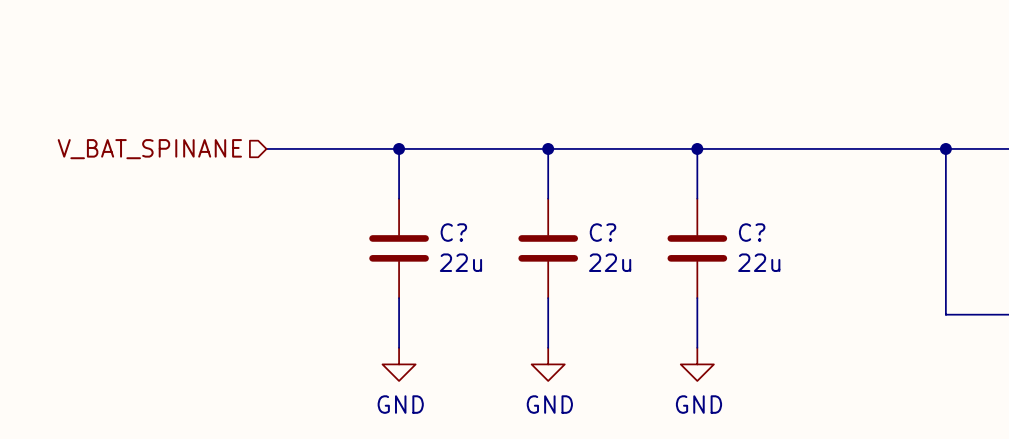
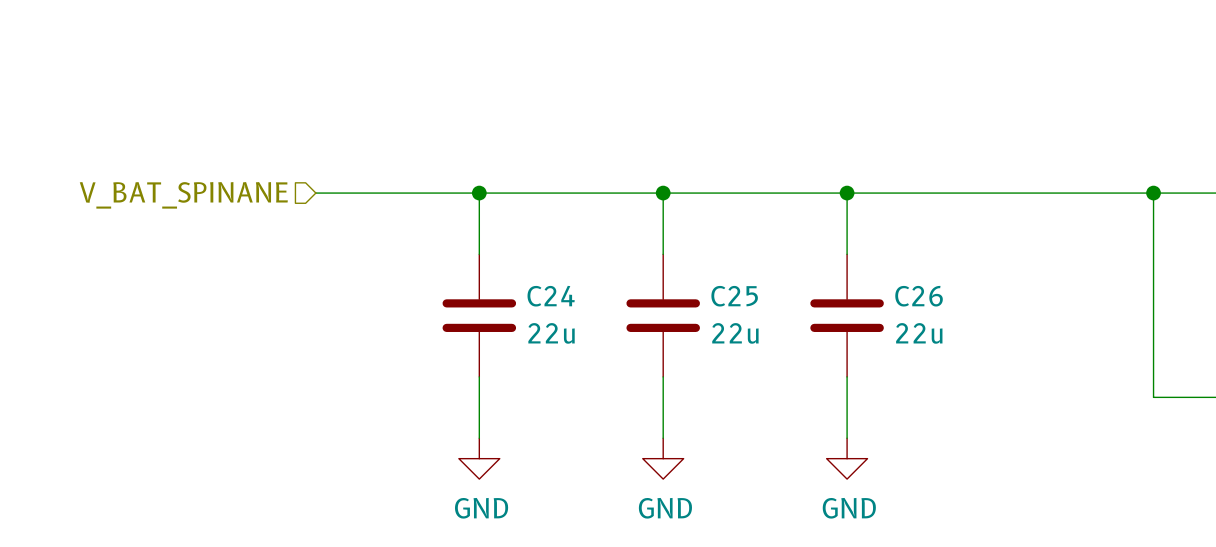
C? name: C? (453, 232) -> C24 (551, 296)
C? name: C? (603, 232) -> C25 (734, 296)
C? name: C? (752, 232) -> C26 (919, 296)

